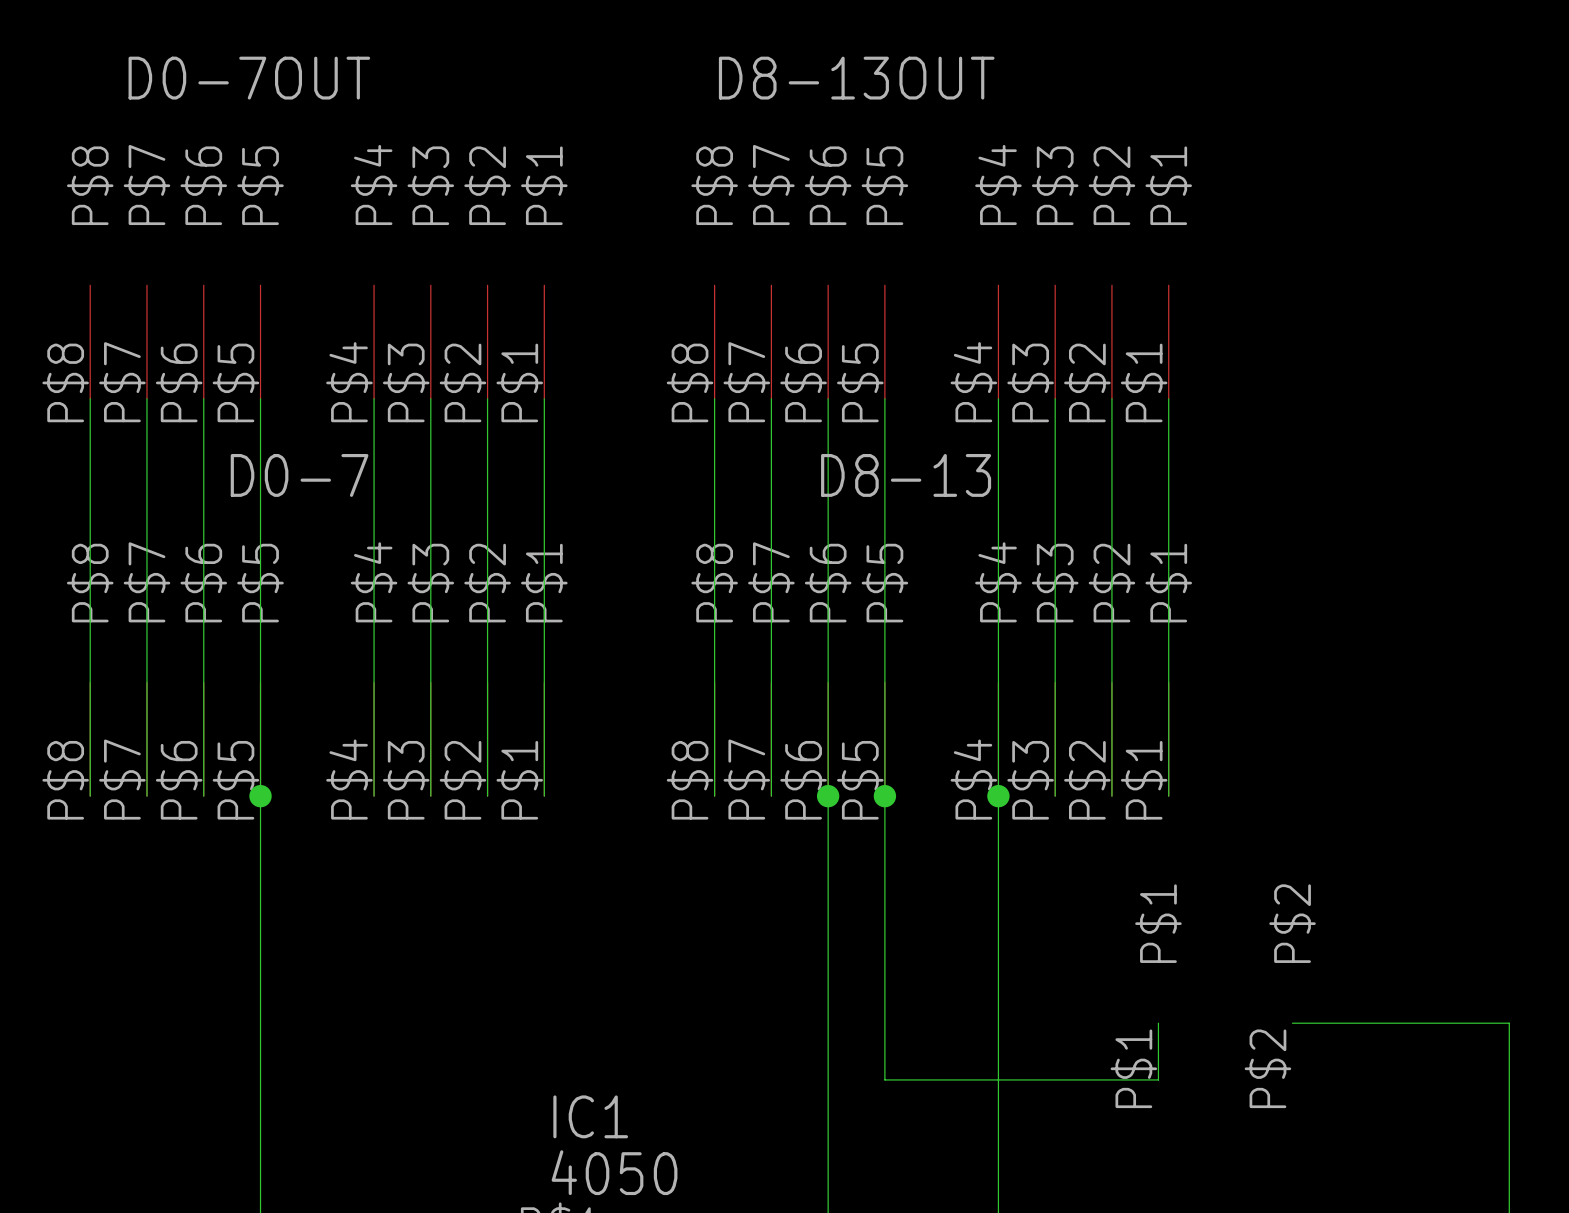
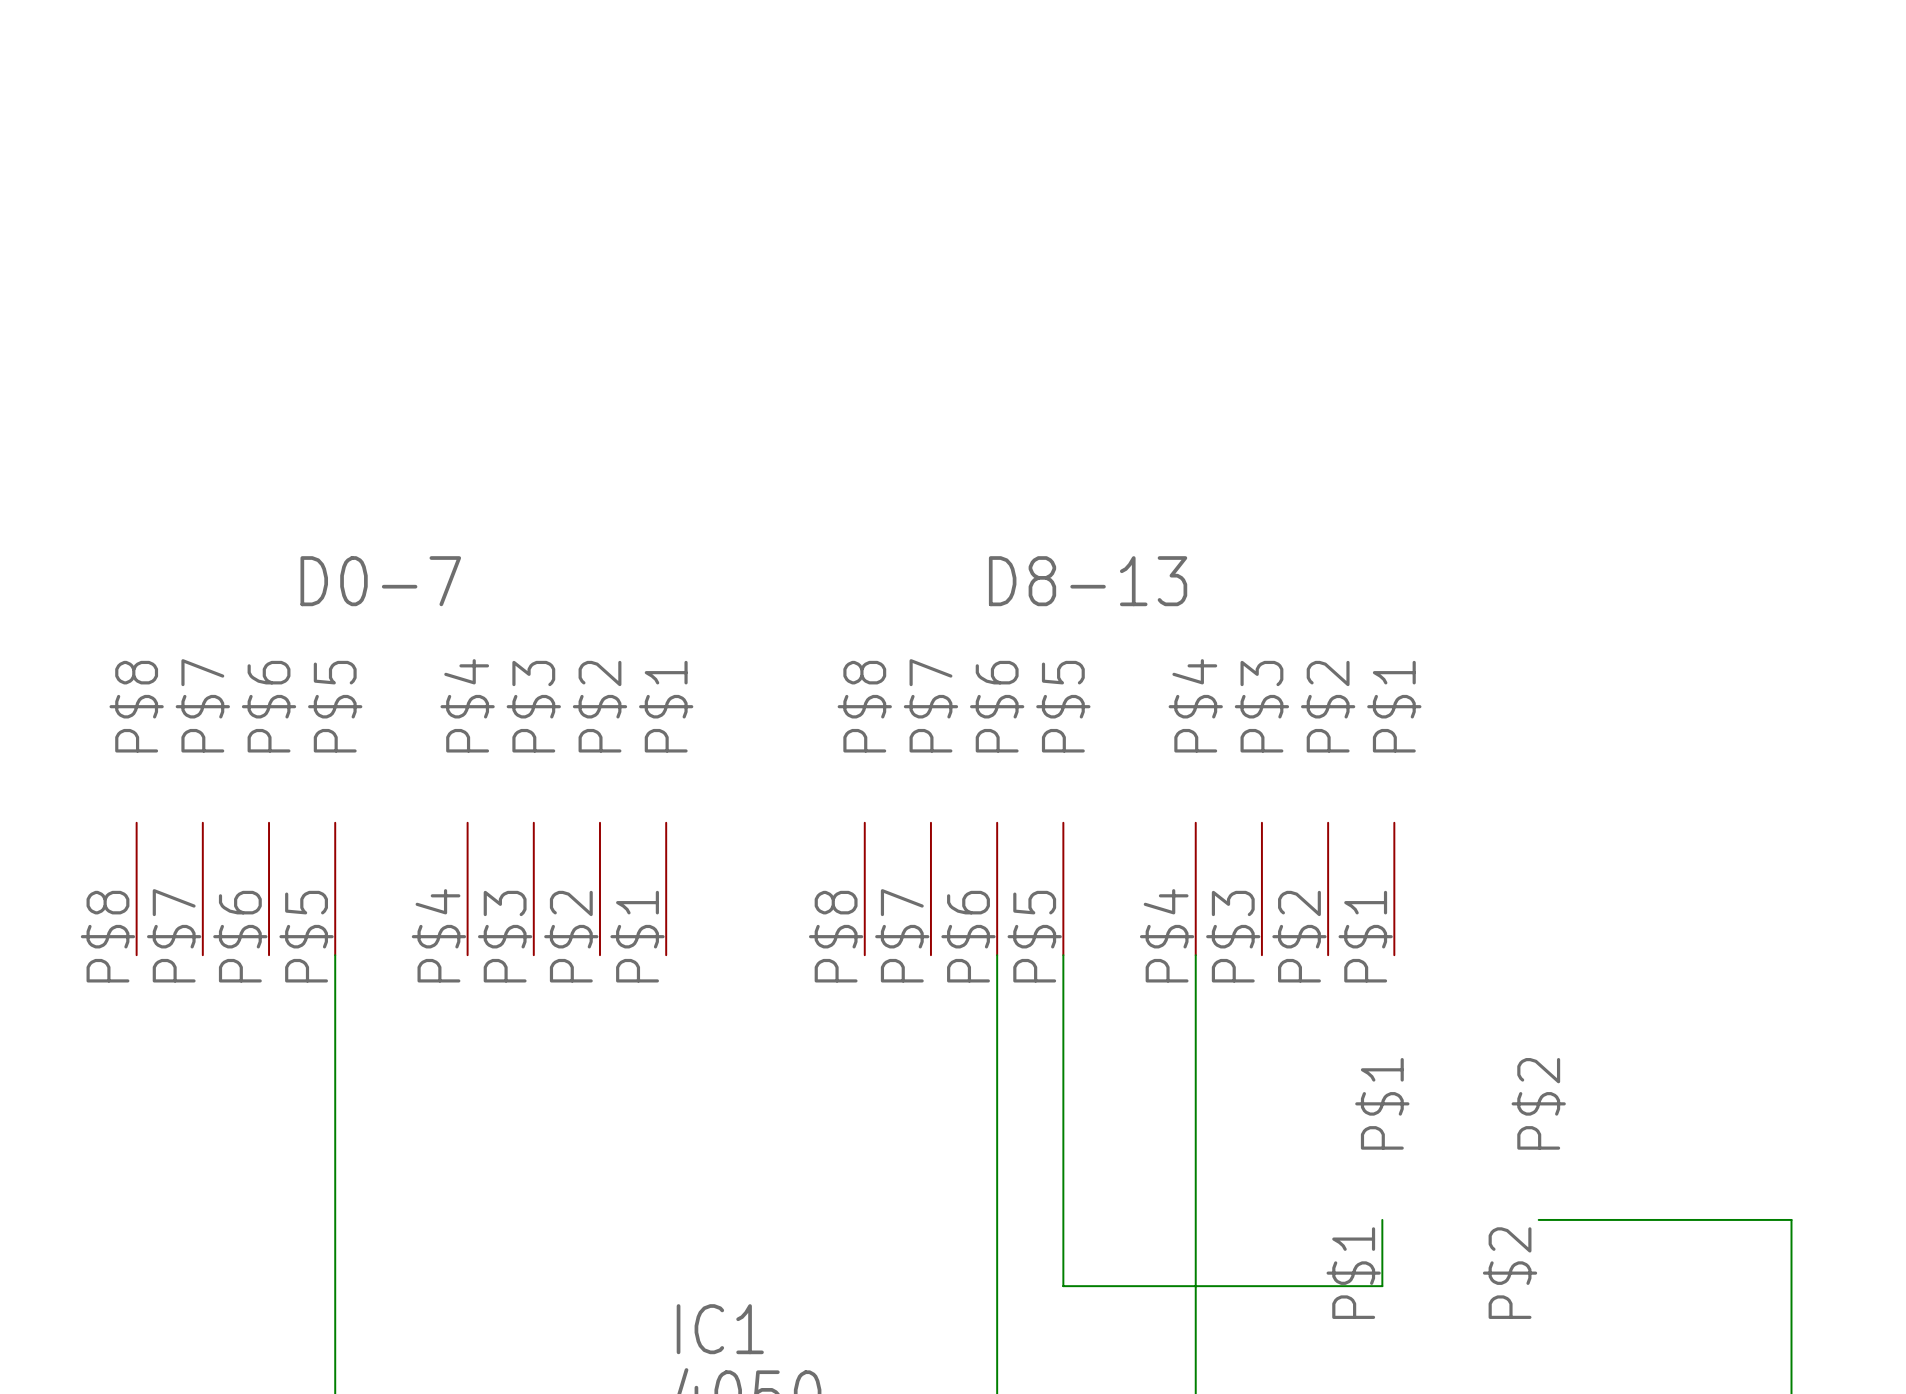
D0-7OUT: (317, 342) -> none
D8-13OUT: (941, 342) -> none
wire: (90, 398) (90, 796) -> none
wire: (146, 398) (146, 796) -> none
wire: (203, 398) (203, 796) -> none
wire: (260, 398) (260, 796) -> none
wire: (374, 398) (374, 796) -> none
wire: (430, 398) (430, 796) -> none
wire: (487, 398) (487, 796) -> none
wire: (544, 398) (544, 796) -> none
wire: (714, 398) (714, 796) -> none
wire: (771, 398) (771, 796) -> none
wire: (828, 398) (828, 796) -> none
wire: (884, 398) (884, 796) -> none
wire: (998, 398) (998, 796) -> none
wire: (1055, 398) (1055, 796) -> none
wire: (1111, 398) (1111, 796) -> none
wire: (1168, 398) (1168, 796) -> none
junction: (260, 796) -> none
junction: (828, 796) -> none
junction: (884, 796) -> none
junction: (998, 796) -> none

